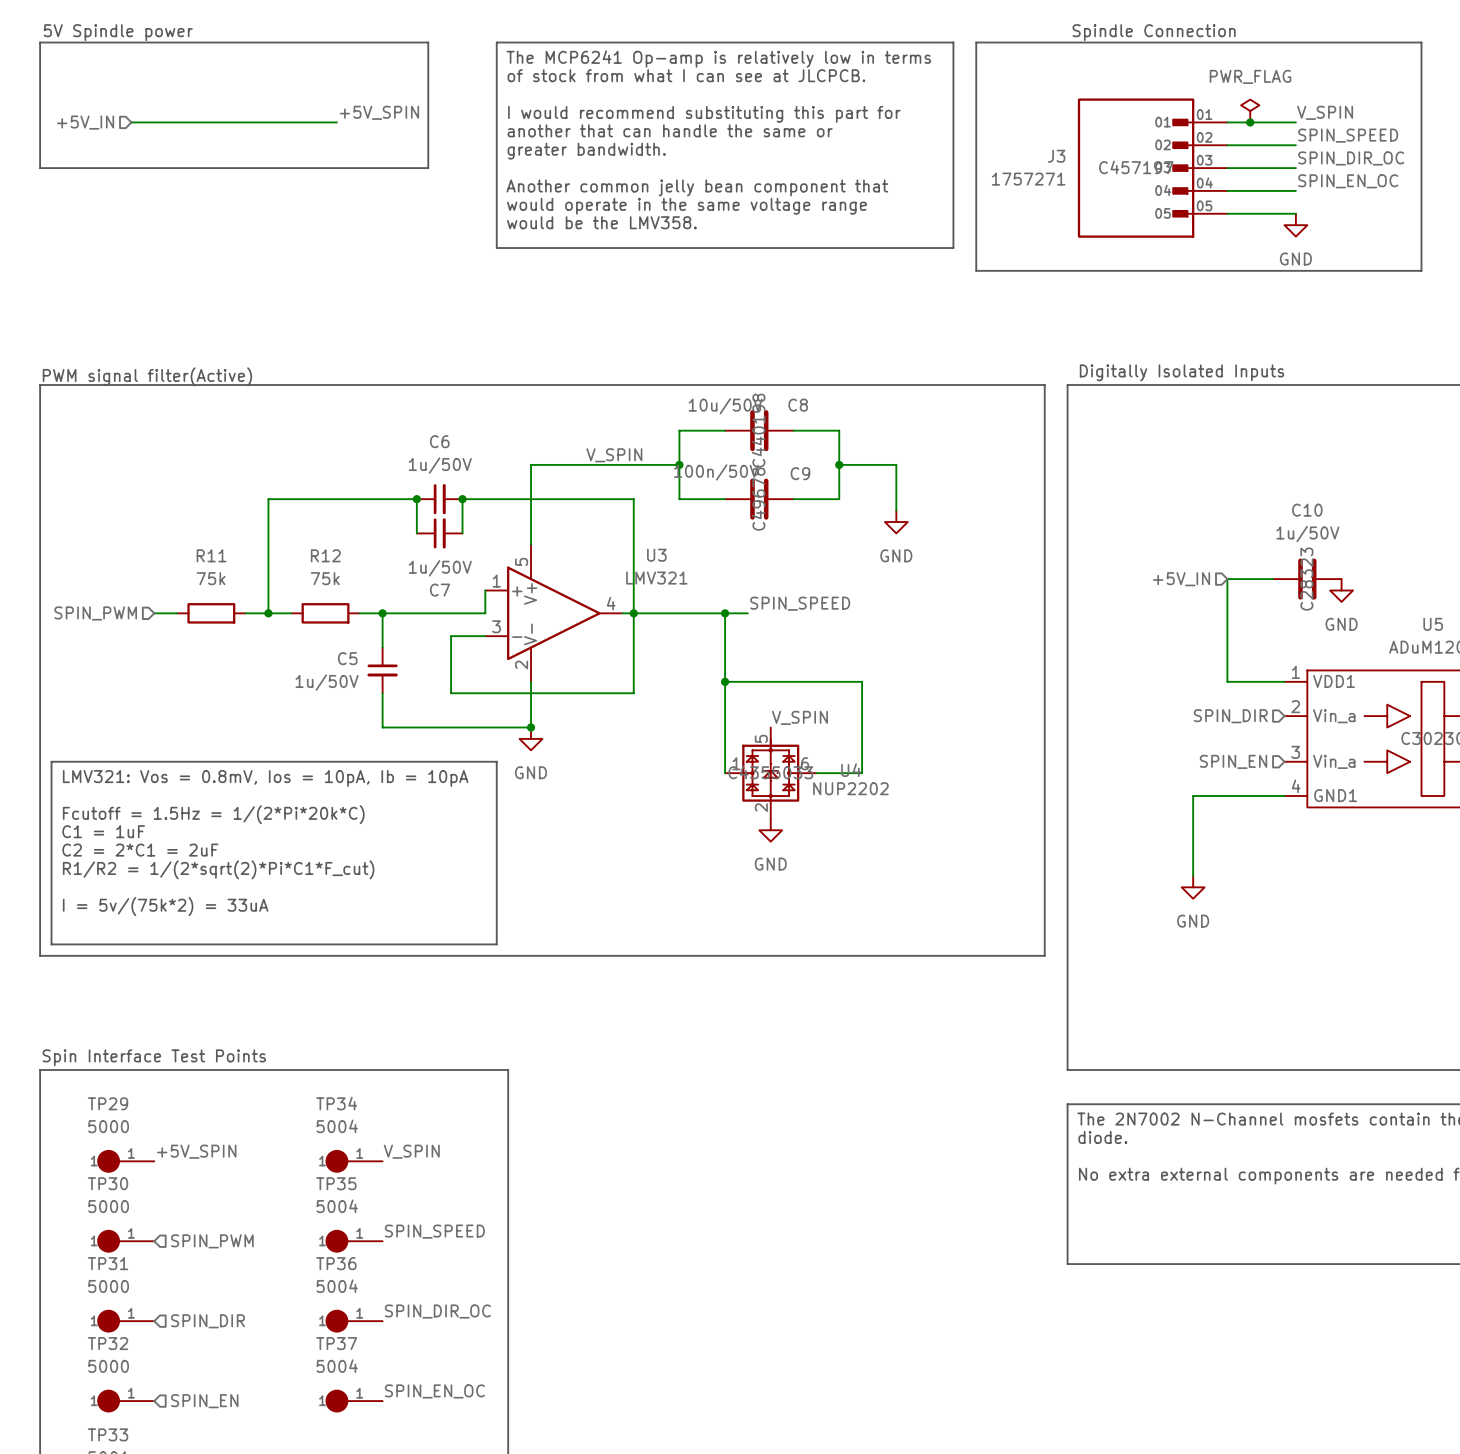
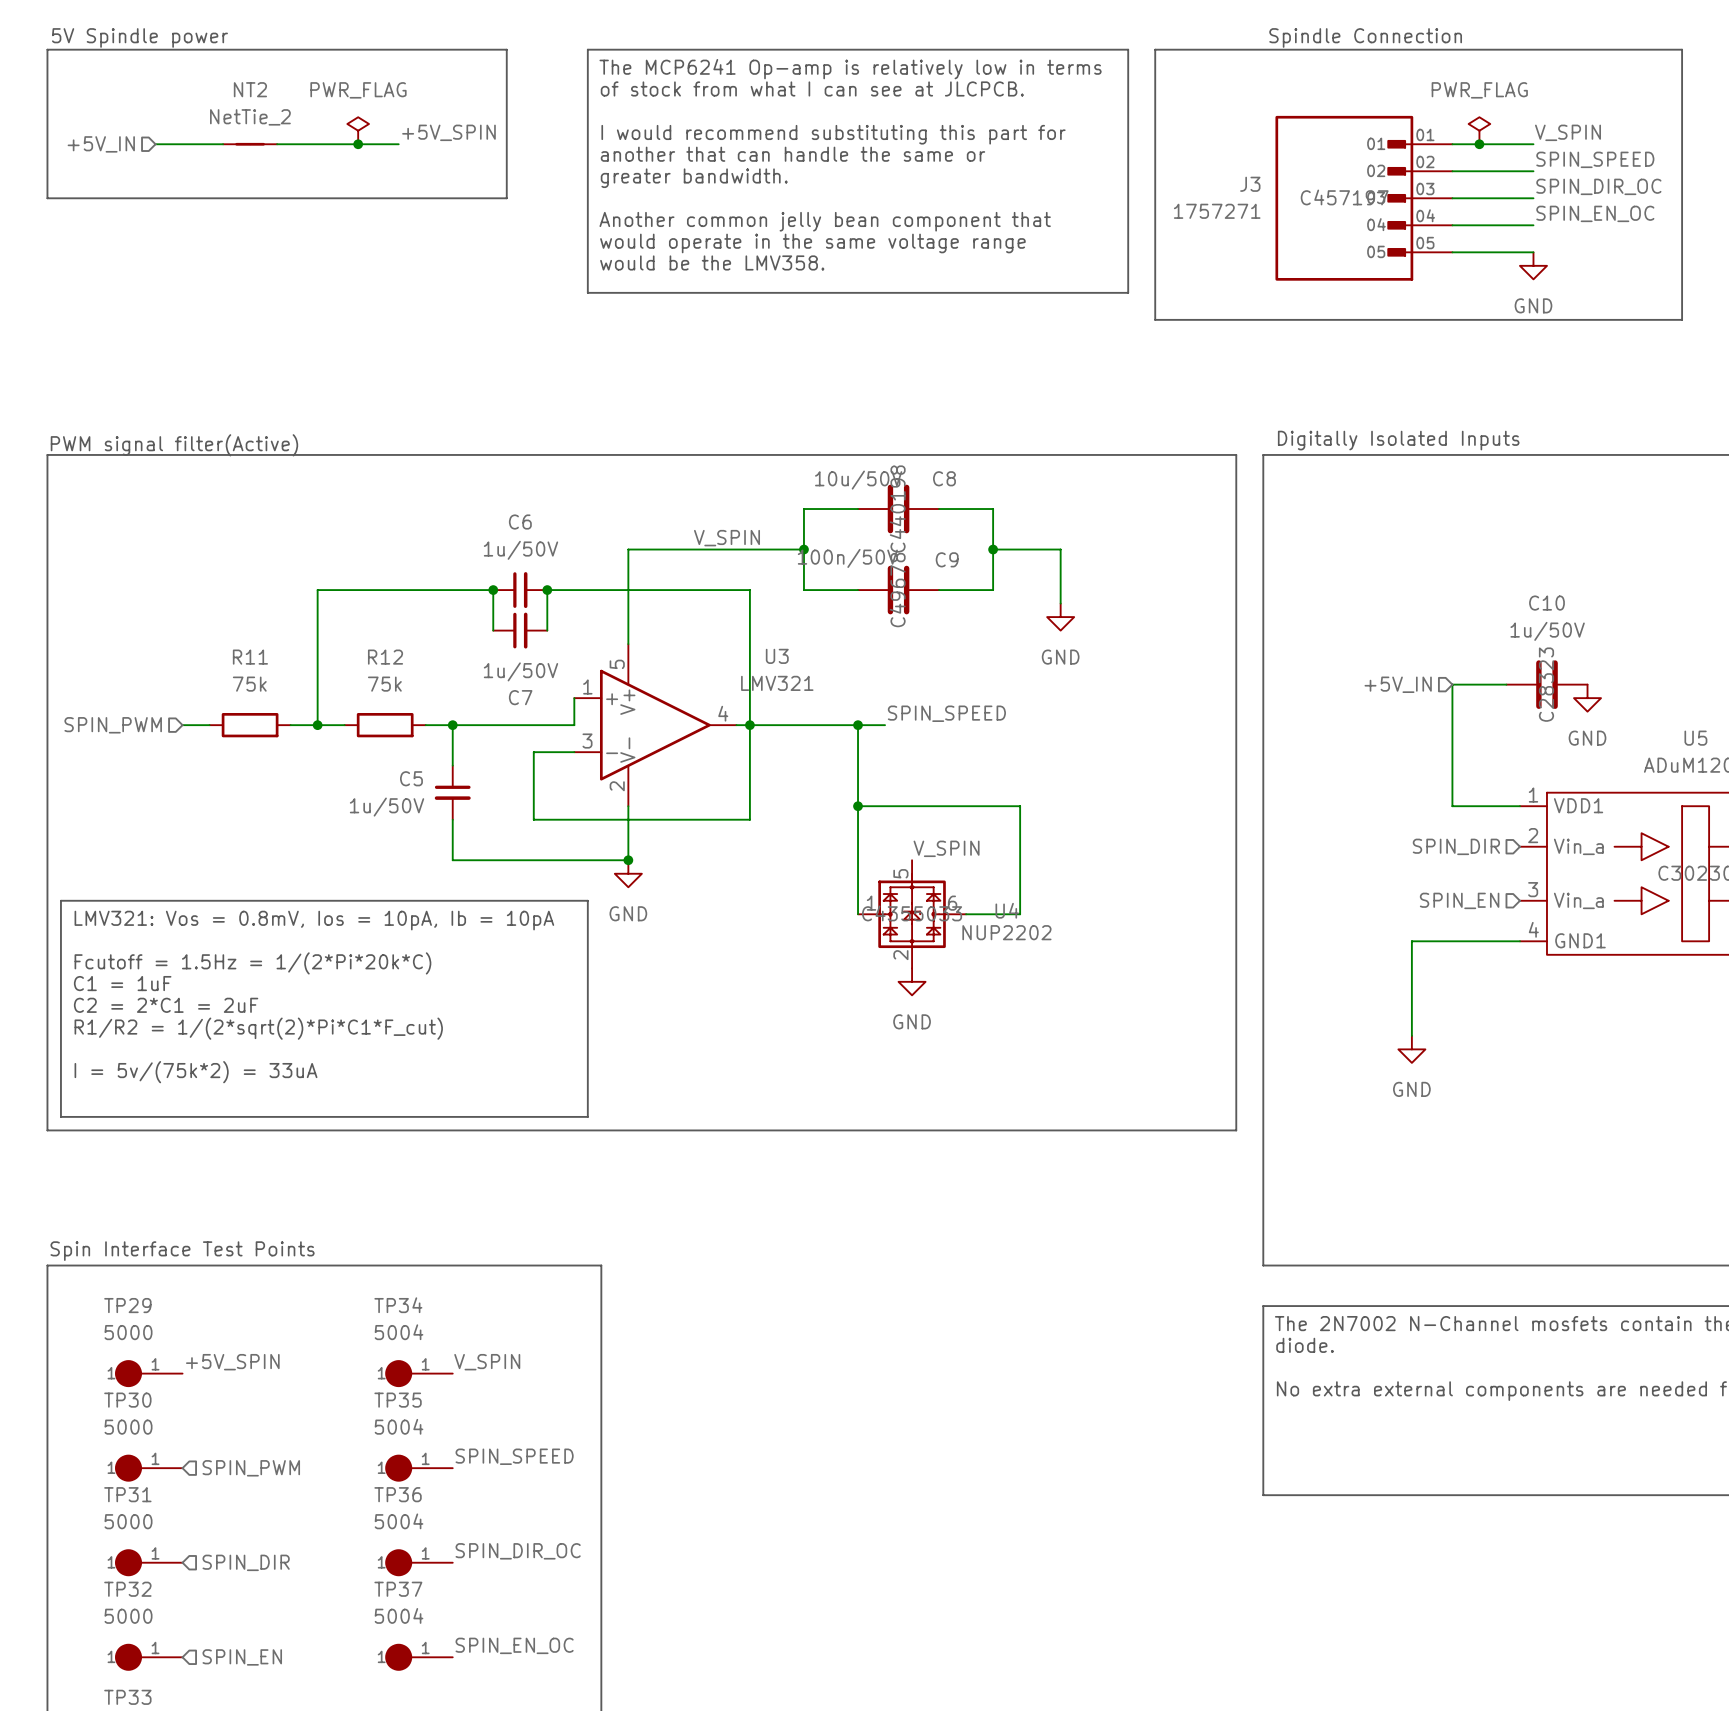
power symbol: none -> PWR_FLAG (358, 130)
NT2: none -> NetTie_2 (250, 144)
junction: none -> (358, 144)

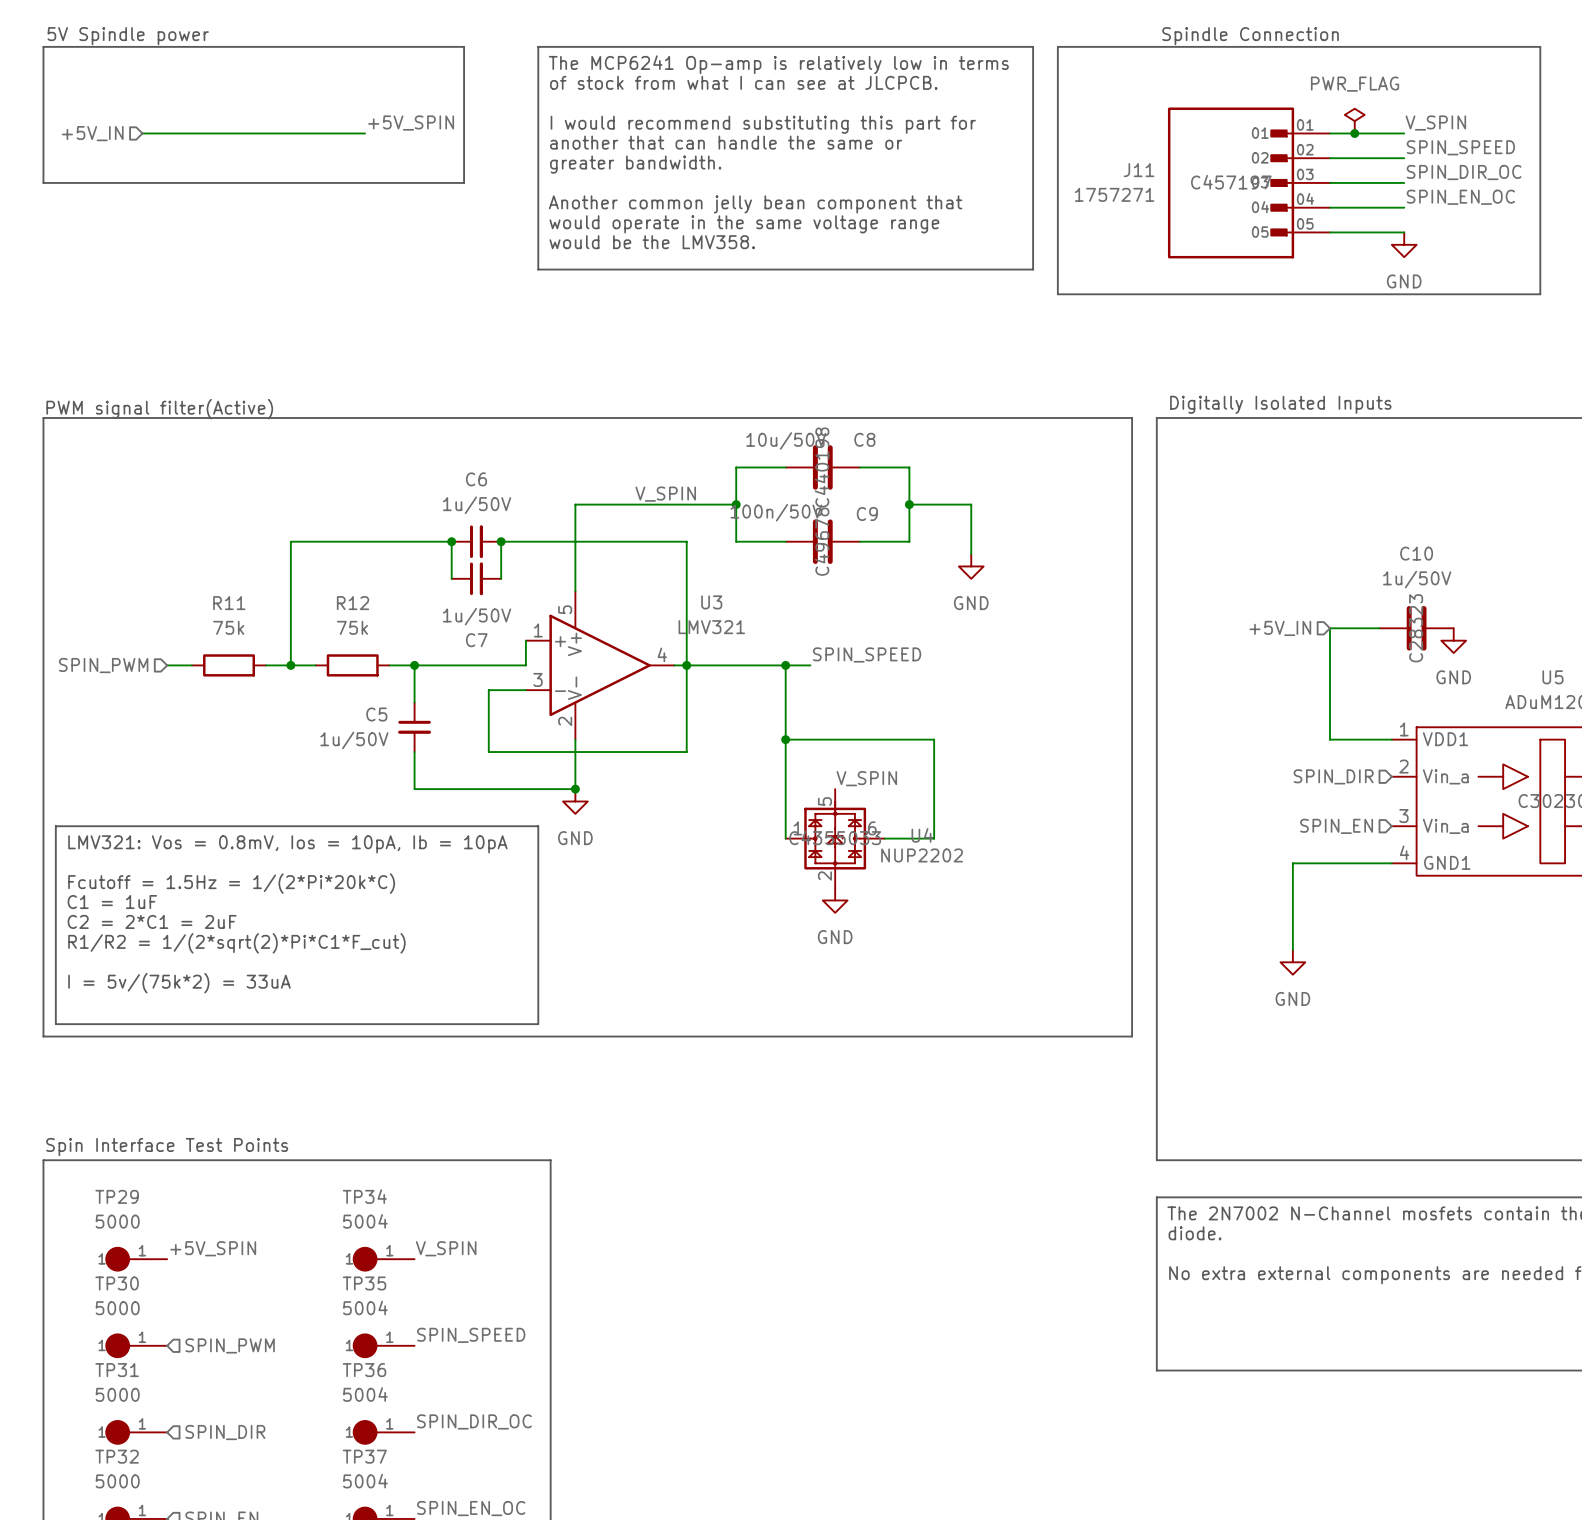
power symbol: PWR_FLAG (358, 130) -> none
NT2: NetTie_2 (250, 144) -> none
junction: (358, 144) -> none
J3 name: J3 (1250, 184) -> J11 (1139, 170)

